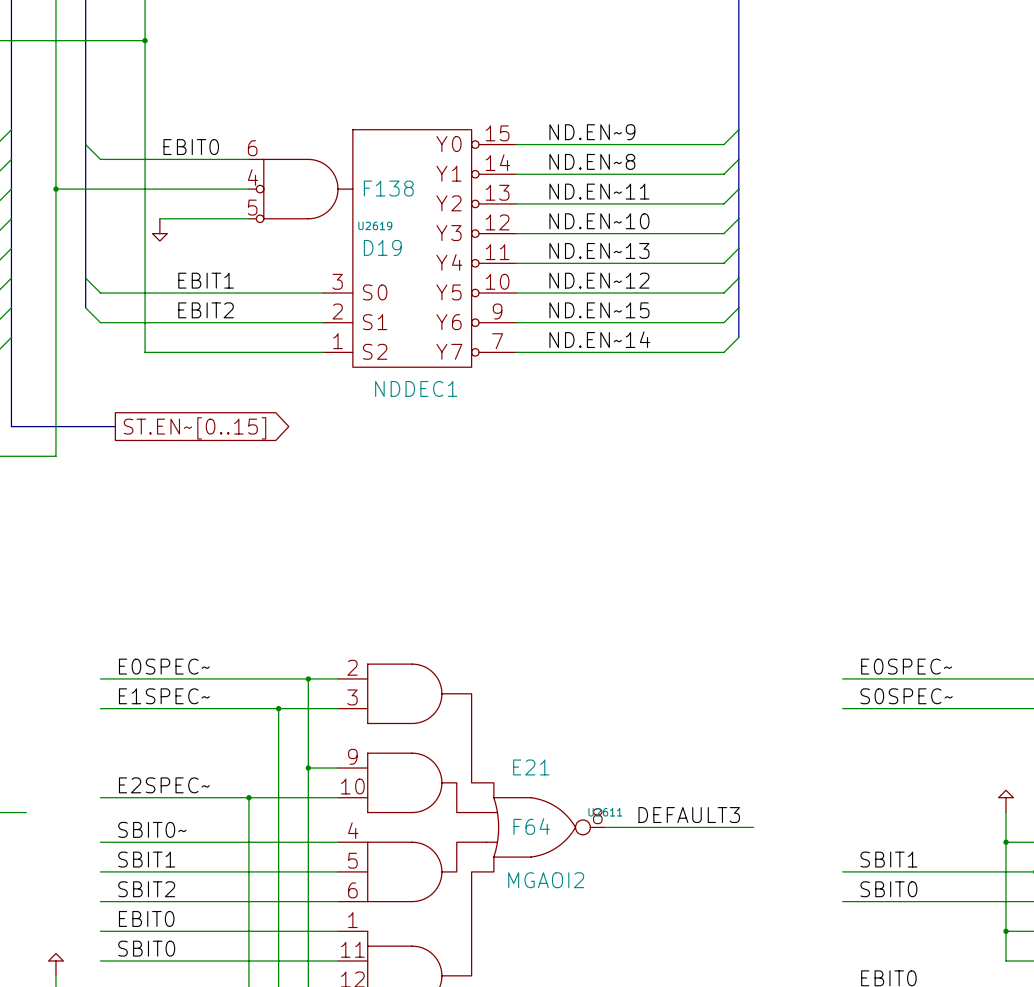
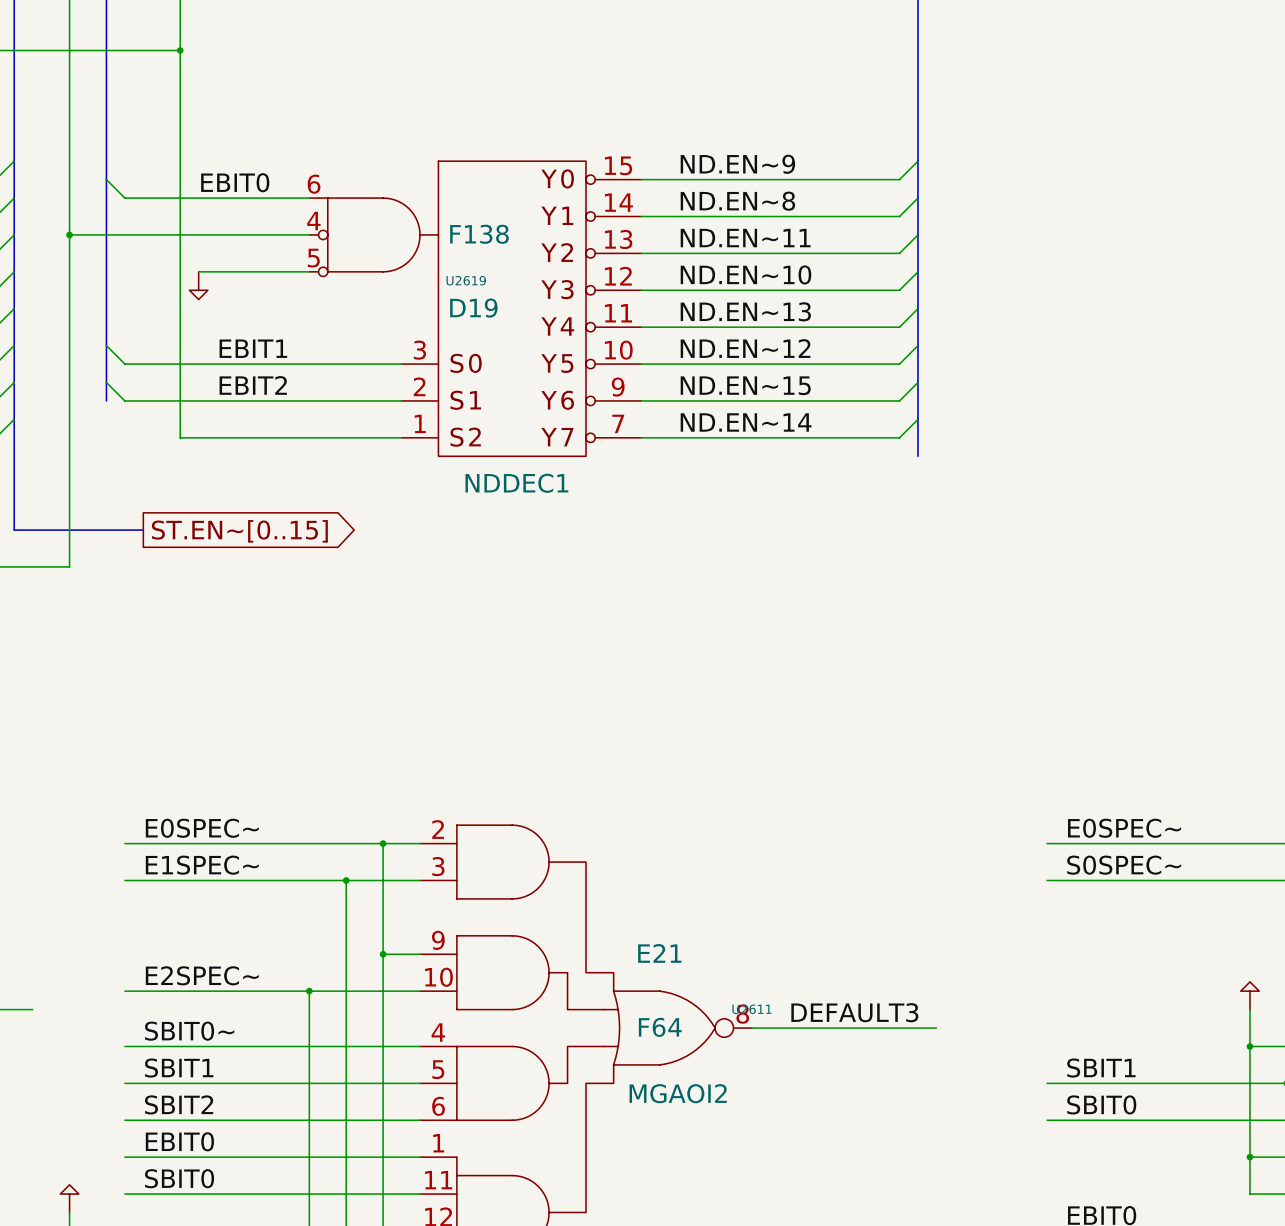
bus: none -> (106, 382) (106, 400)
bus: none -> (917, 419) (917, 456)

